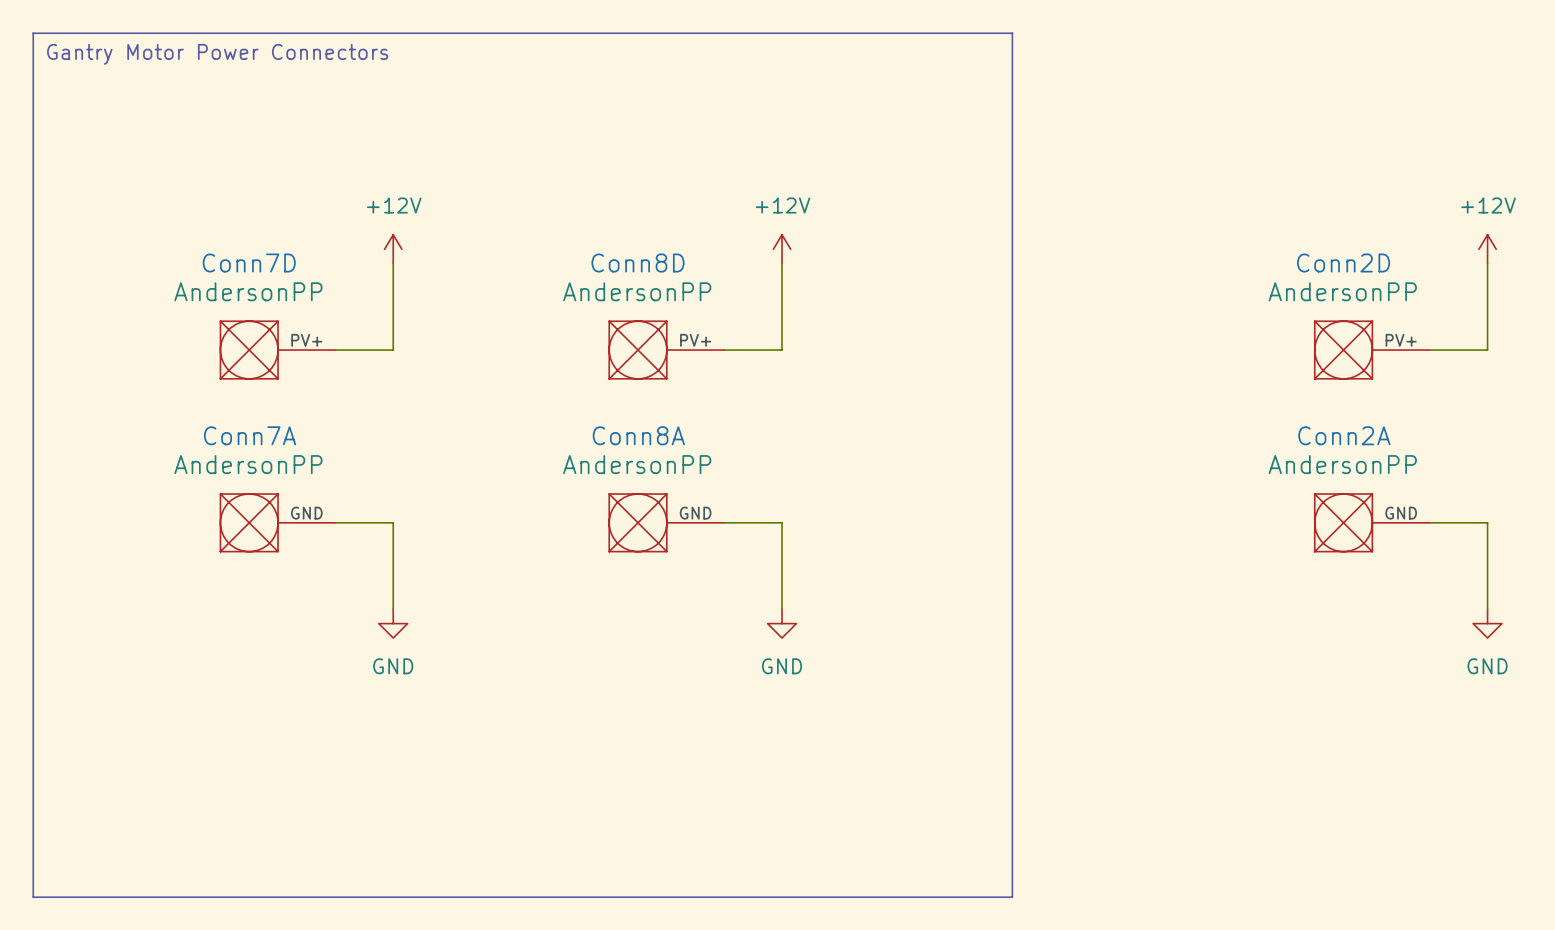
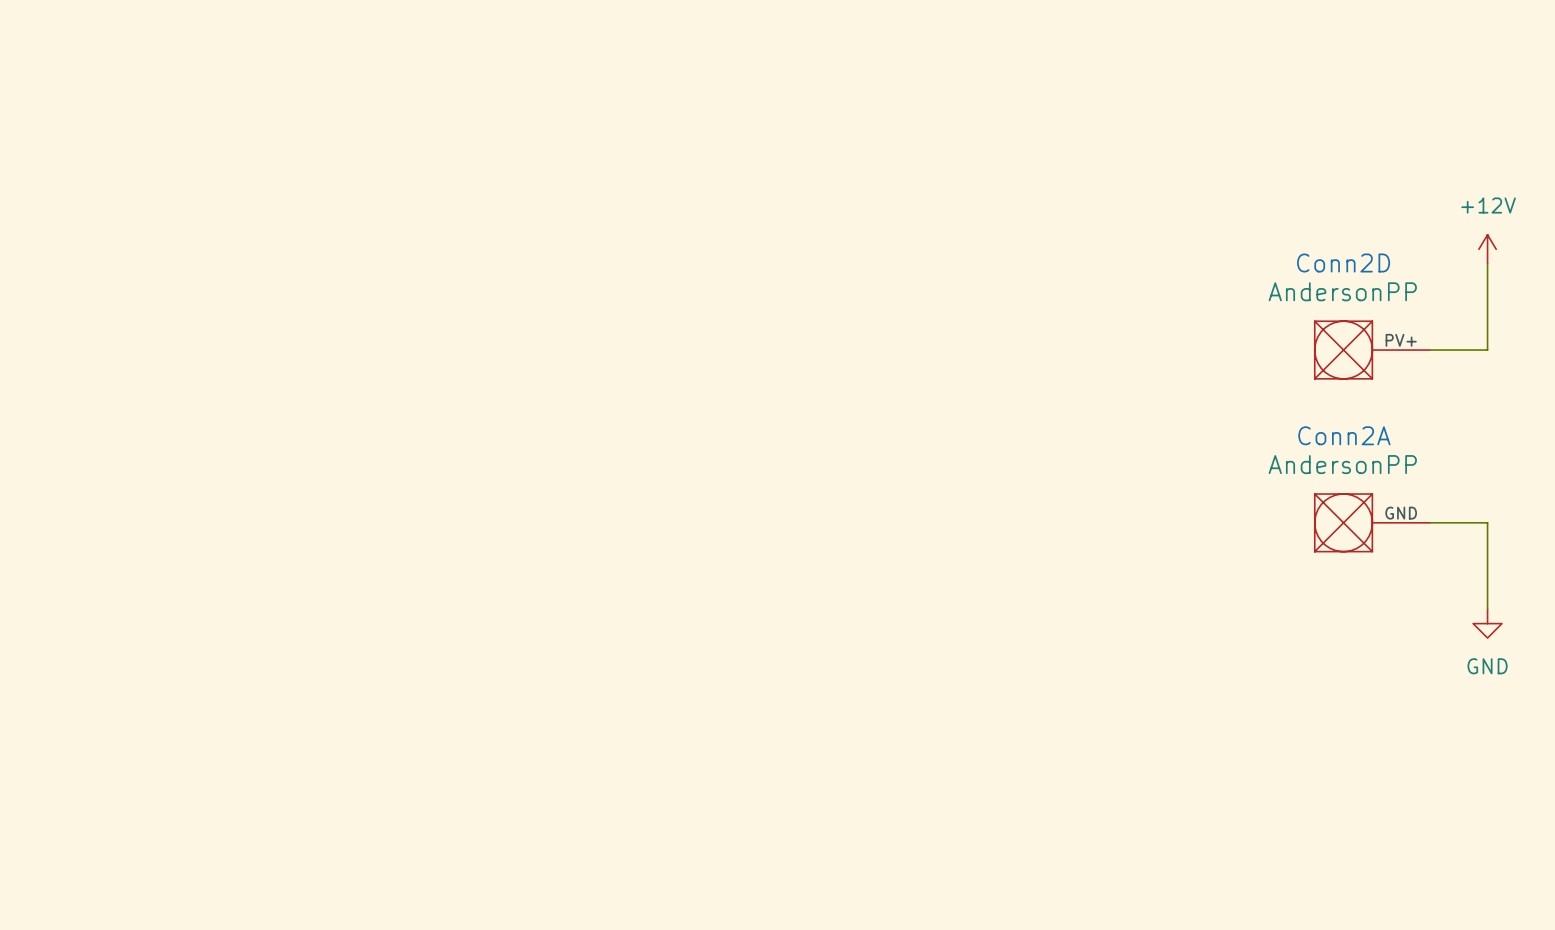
line: (33, 33) (1012, 33) (1012, 897) (33, 897) (33, 33) -> none
text: Gantry Motor Power Connectors (217, 54) -> none
power symbol: +12V (393, 249) -> none
power symbol: +12V (782, 249) -> none
wire: (393, 263) (393, 350) (335, 350) -> none
wire: (782, 263) (782, 350) (724, 350) -> none
Conn7D: AndersonPP (278, 350) -> none
Conn8D: AndersonPP (666, 350) -> none
Conn7A: AndersonPP (278, 522) -> none
wire: (335, 522) (393, 522) (393, 609) -> none
Conn8A: AndersonPP (666, 522) -> none
wire: (724, 522) (782, 522) (782, 609) -> none
power symbol: GND (393, 623) -> none
power symbol: GND (782, 623) -> none

